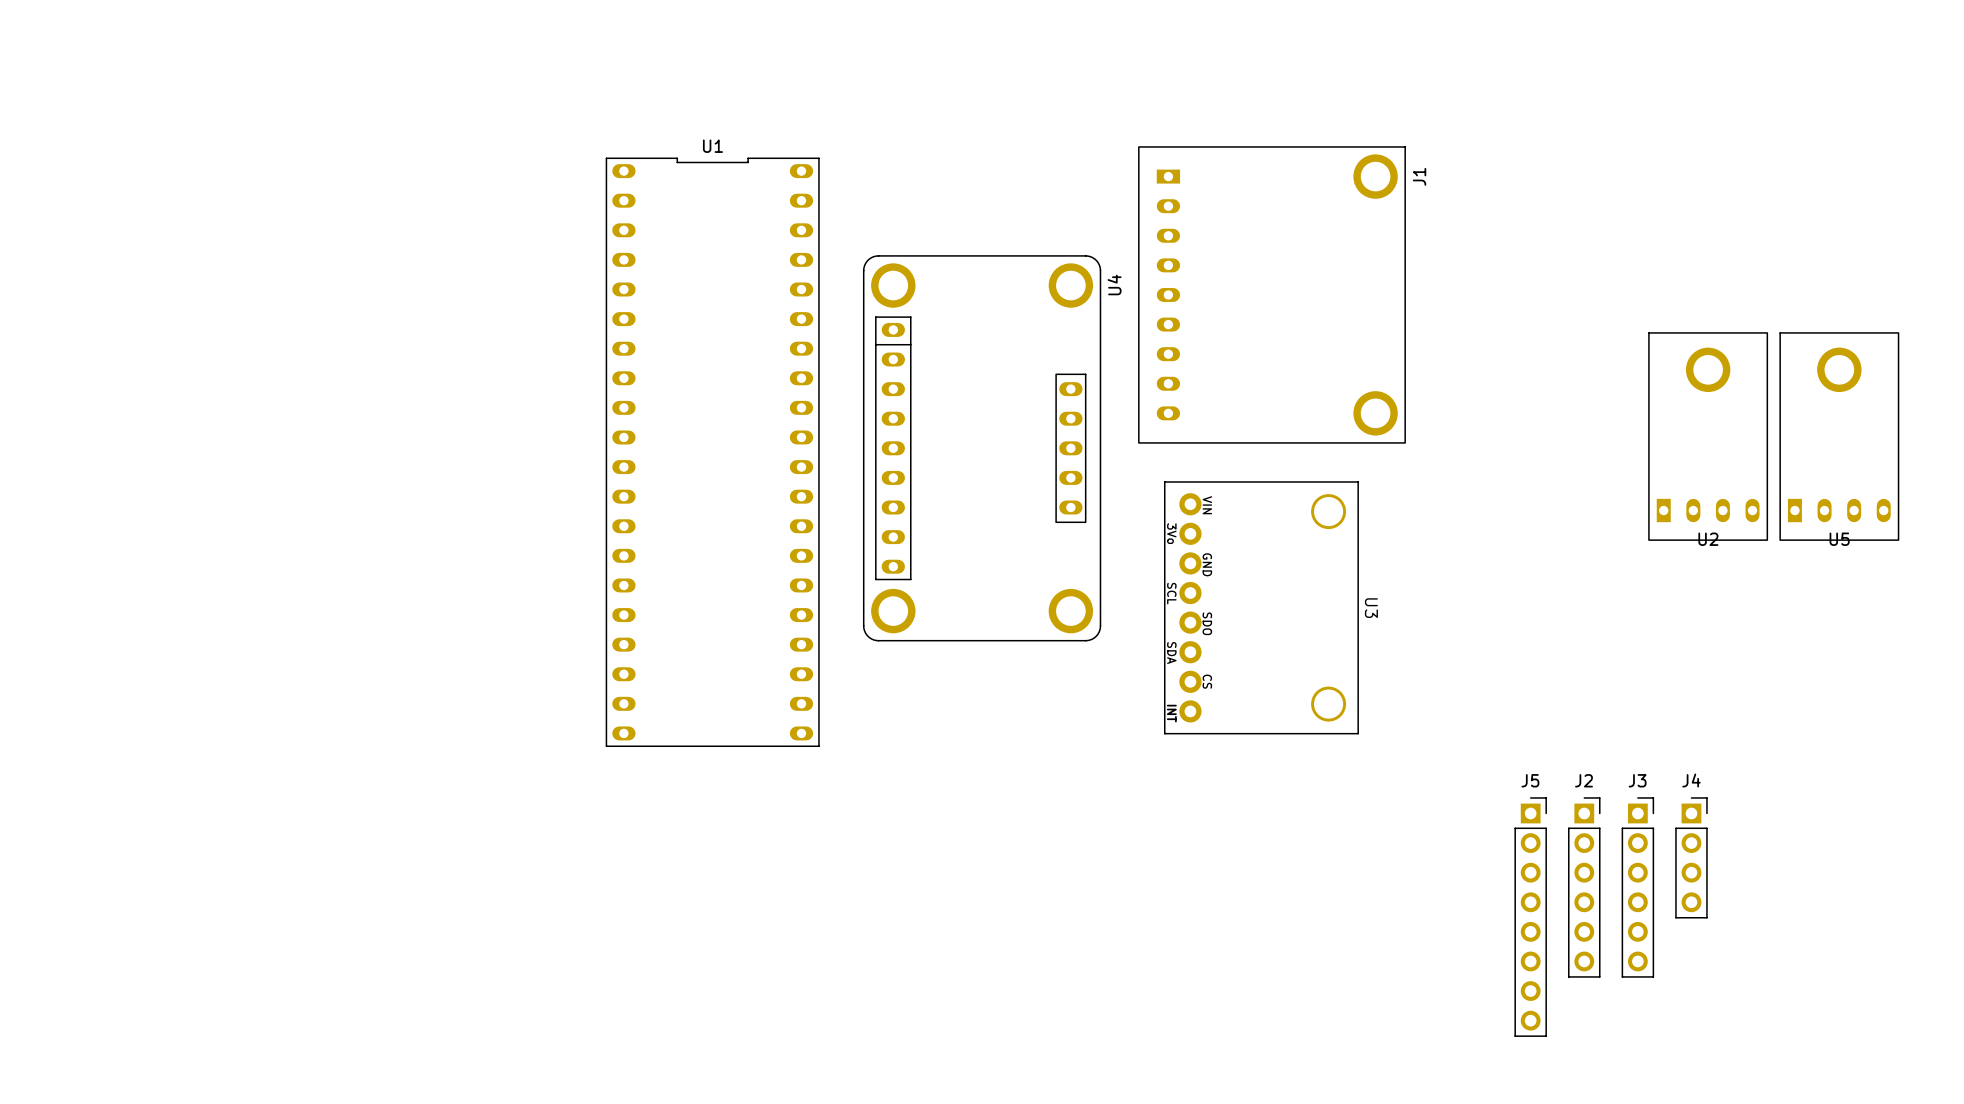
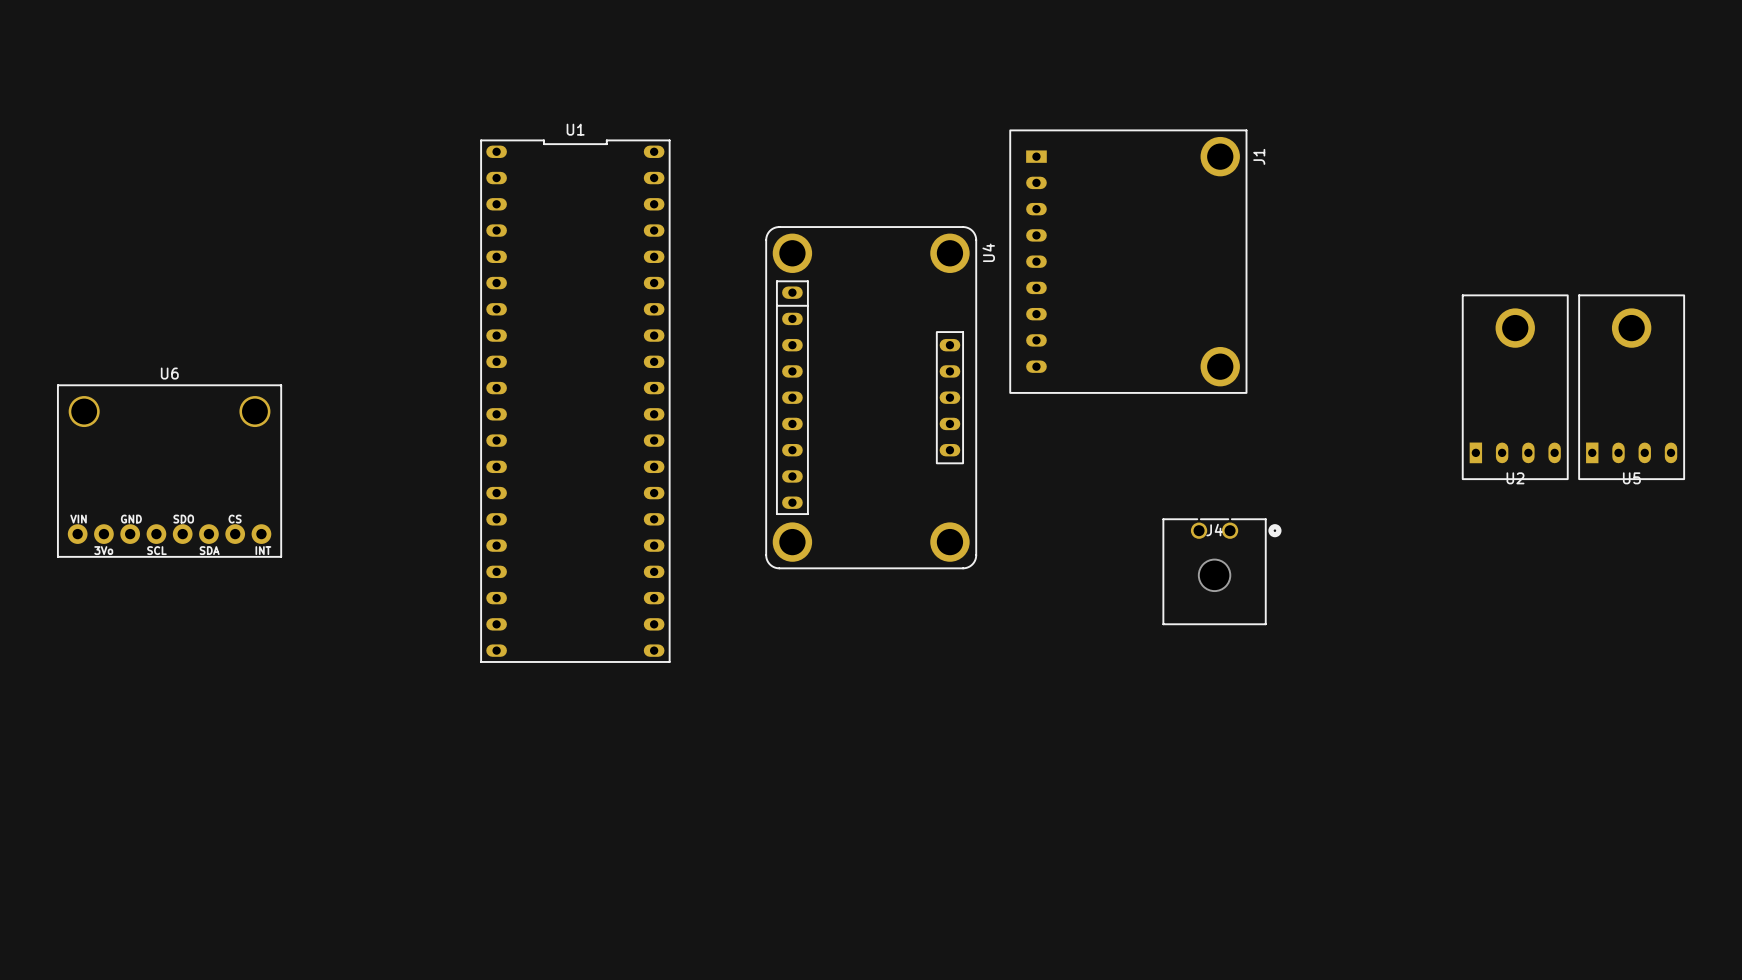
U1 position: (712, 452) -> (575, 401)
U6: none -> (169, 471)
U3: (1261, 607) -> none
J4 name position: J4 (1691, 780) -> J4 (1214, 530)
J4 footprint: [1675, 797, 1708, 919] -> [1162, 518, 1282, 626]
J2: (1584, 887) -> none
J3: (1637, 887) -> none
J5: (1530, 917) -> none

